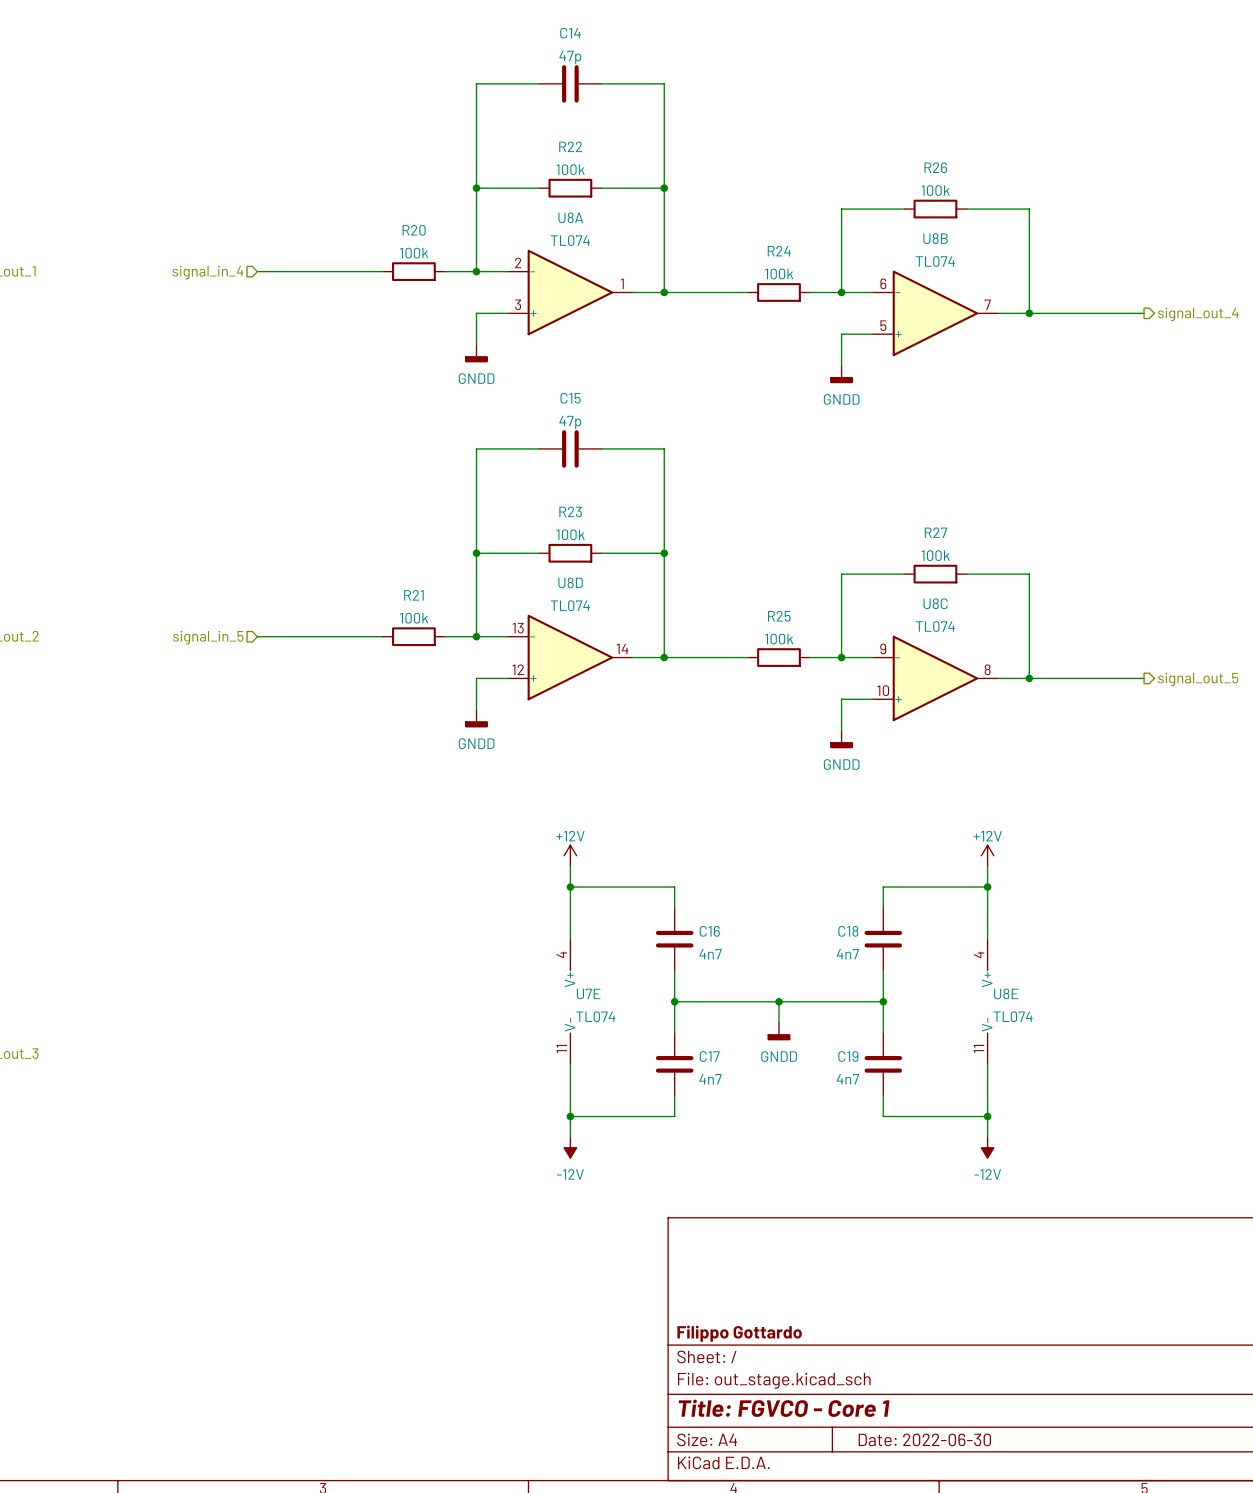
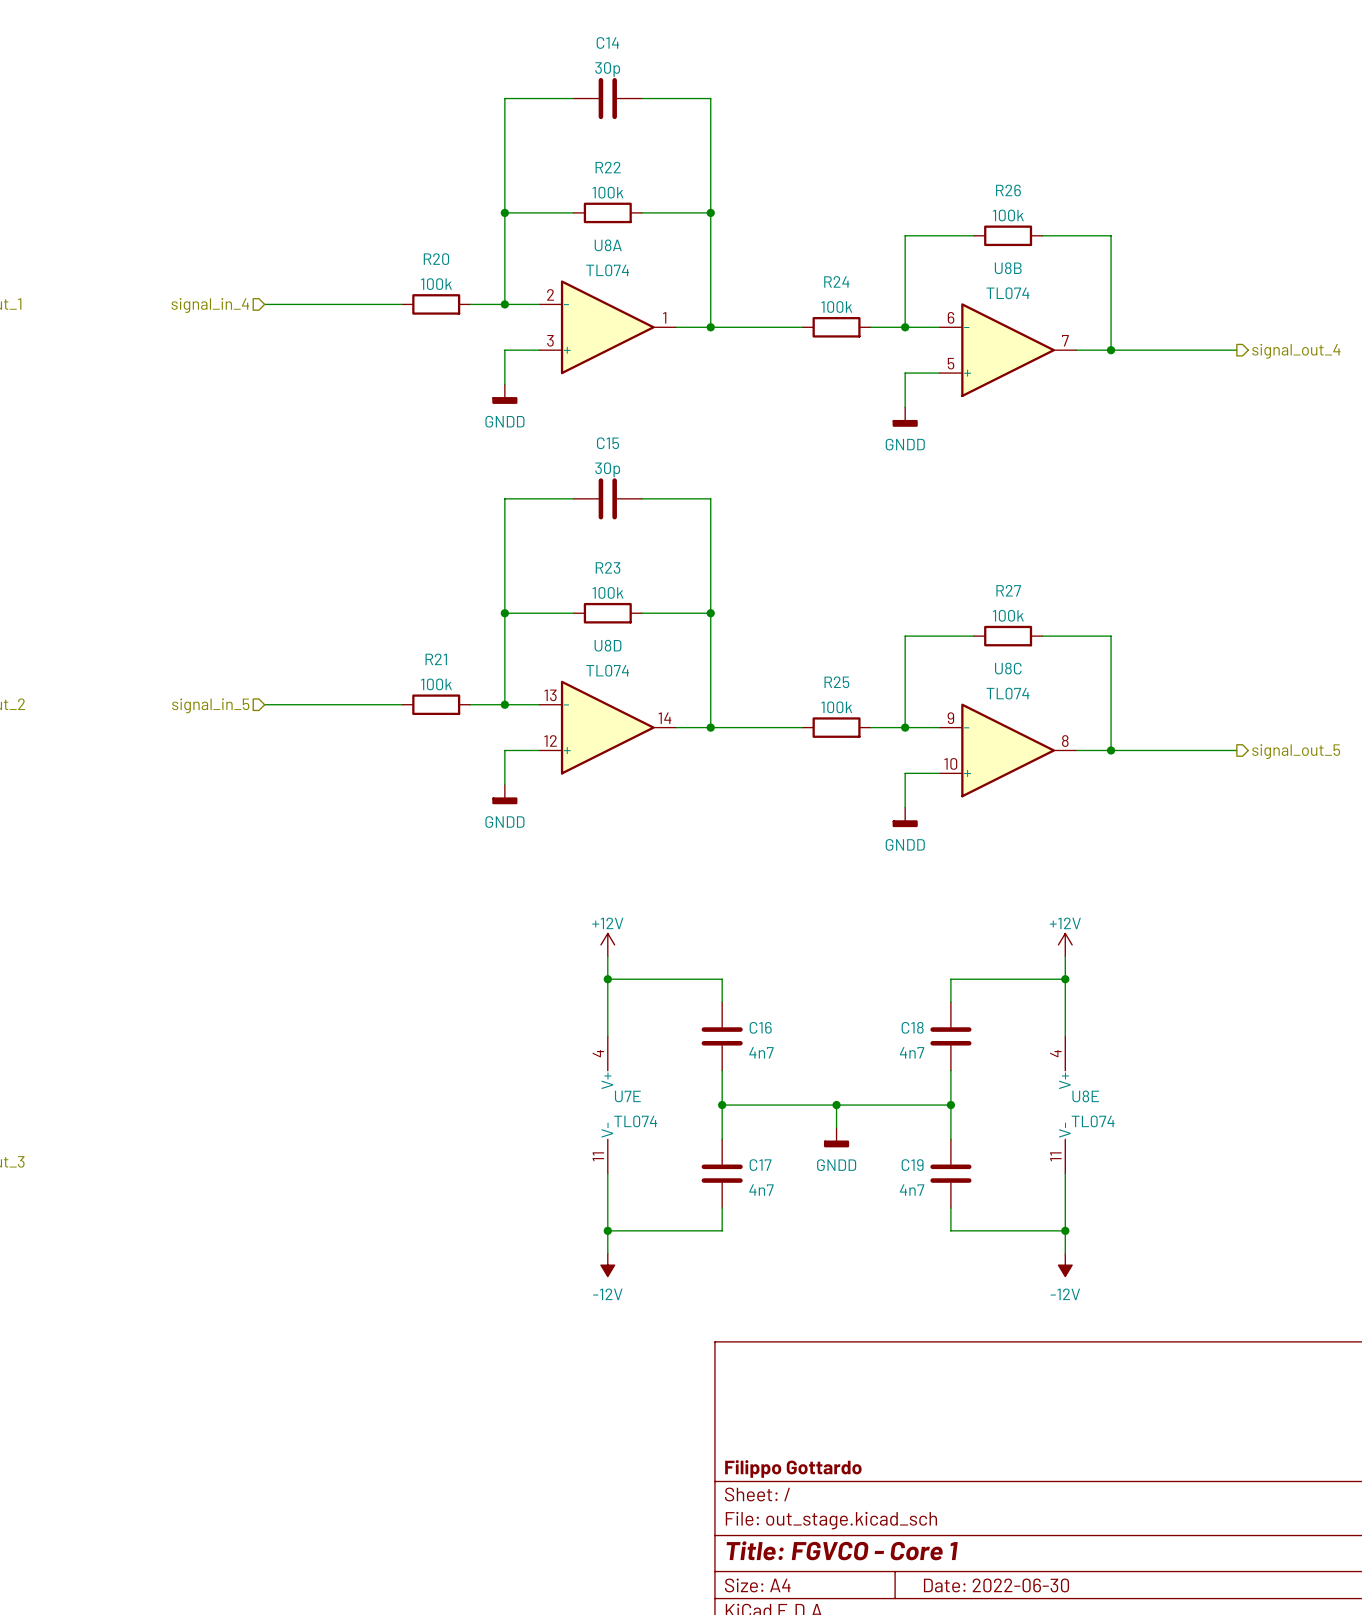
C14 value: 47p (570, 57) -> 30p (607, 69)
C15 value: 47p (570, 422) -> 30p (607, 469)

